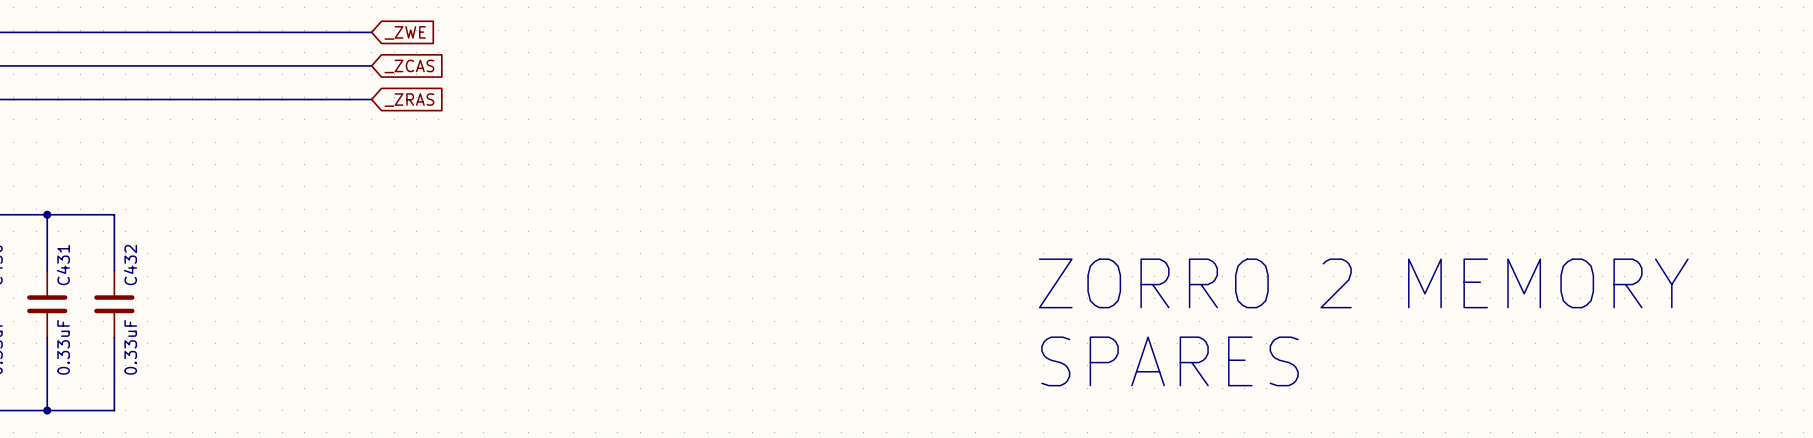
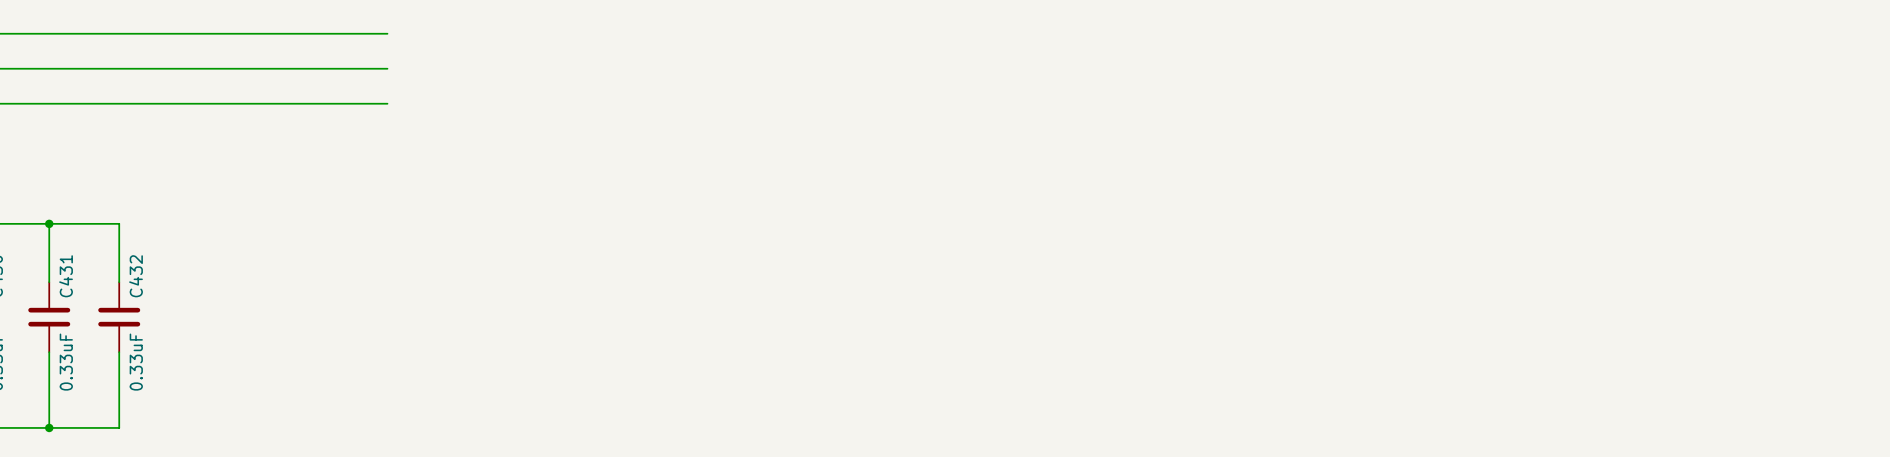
global label: _ZWE (405, 32) -> none
global label: _ZCAS (409, 66) -> none
global label: _ZRAS (409, 100) -> none
text: ZORRO 2 MEMORY (1363, 283) -> none
text: SPARES (1169, 361) -> none

